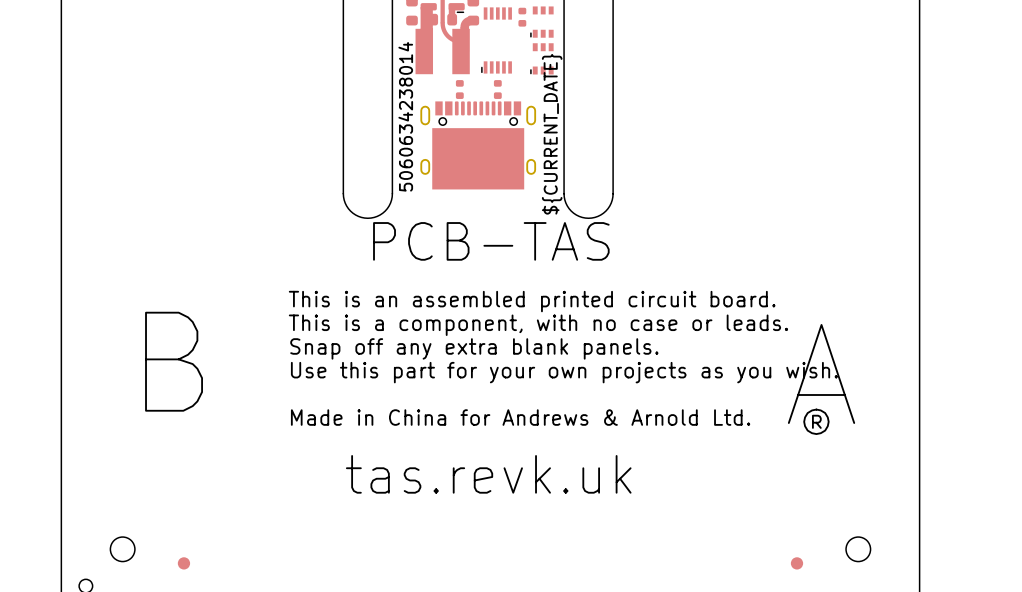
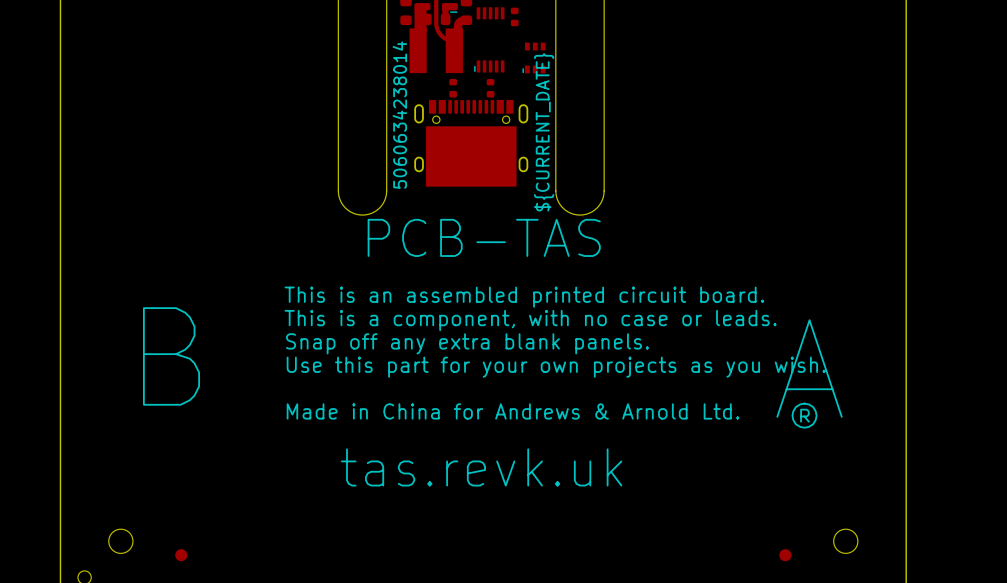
part: (541, 22) -> none

